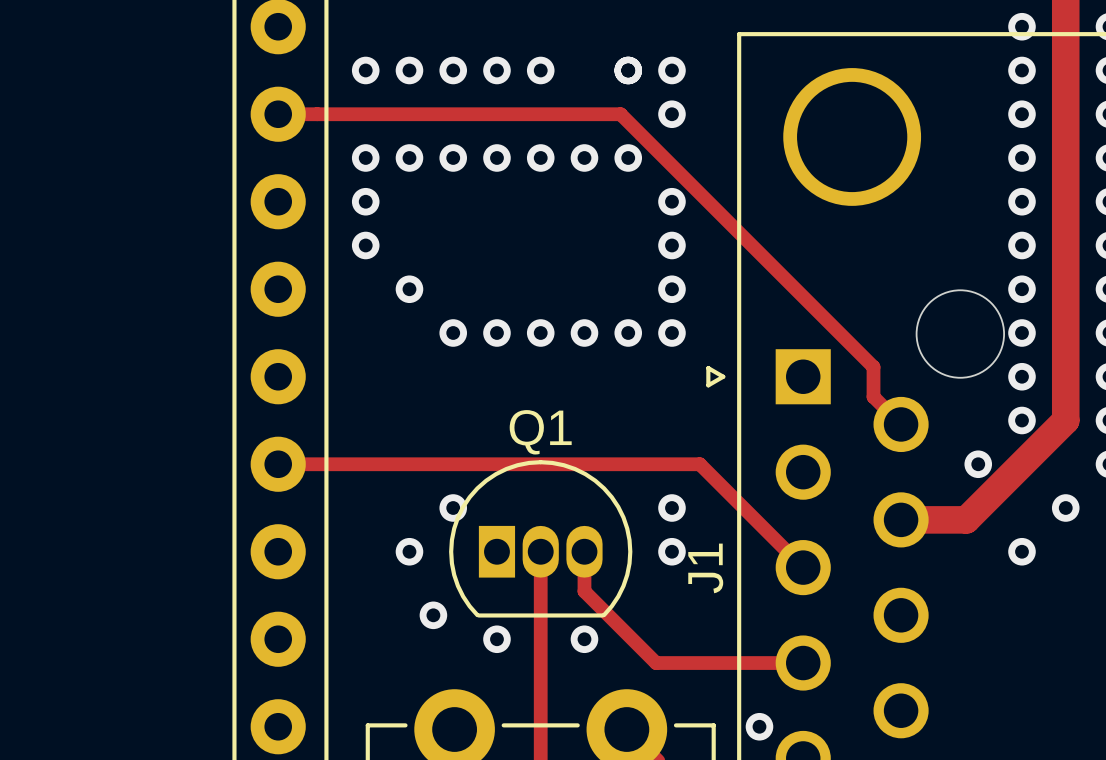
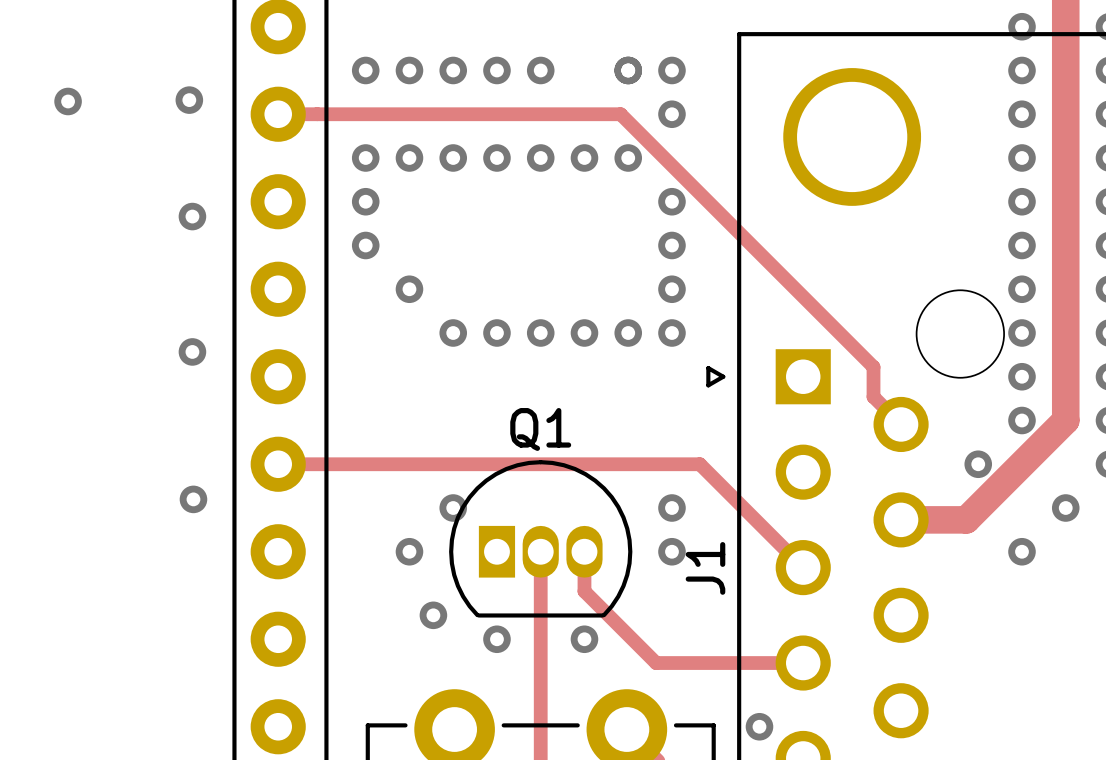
via: none -> (189, 100)
via: none -> (68, 101)
via: none -> (192, 216)
via: none -> (192, 351)
via: none -> (193, 499)

